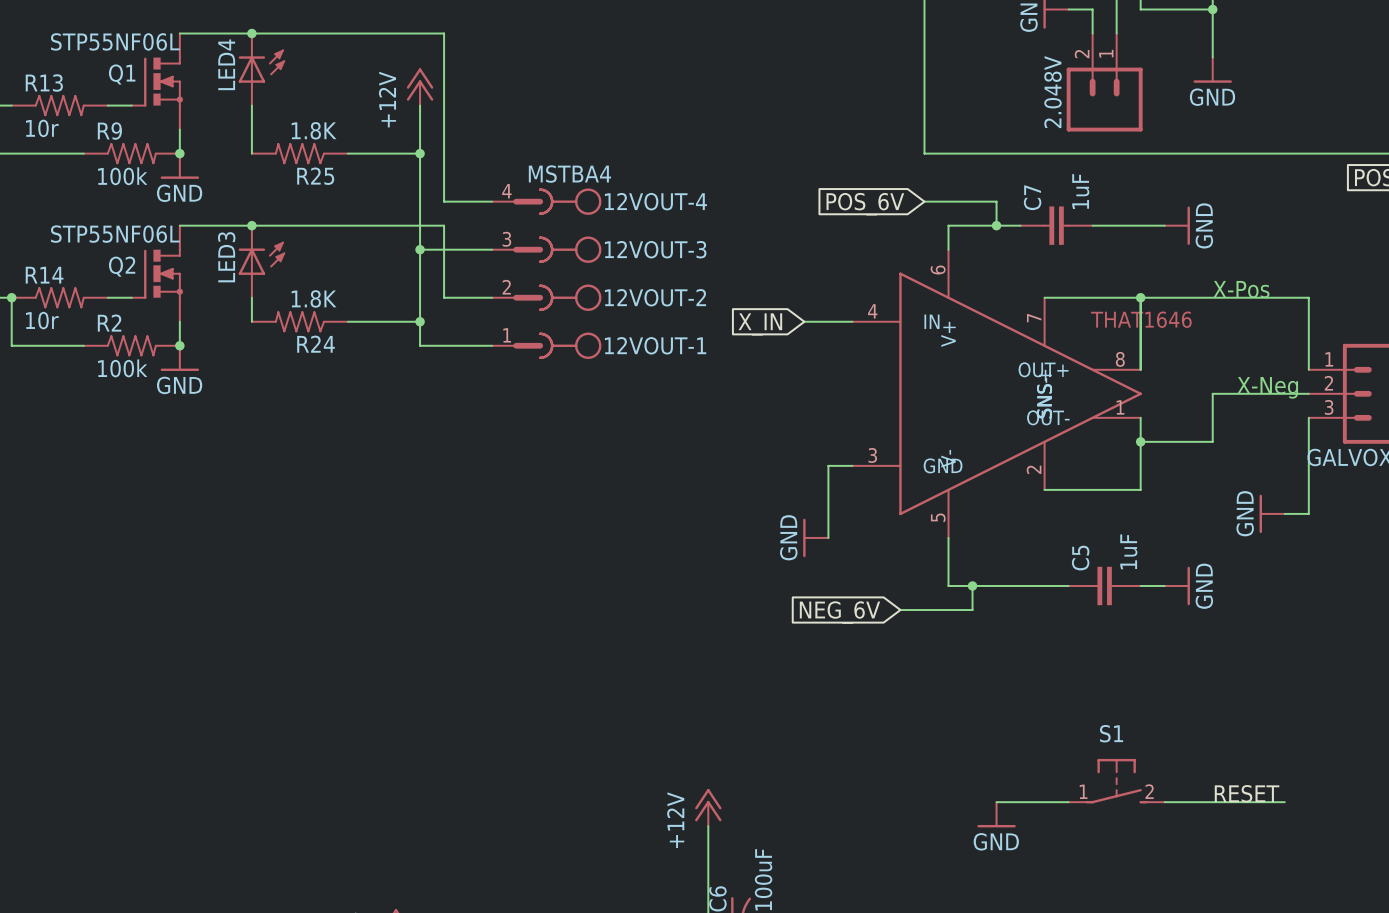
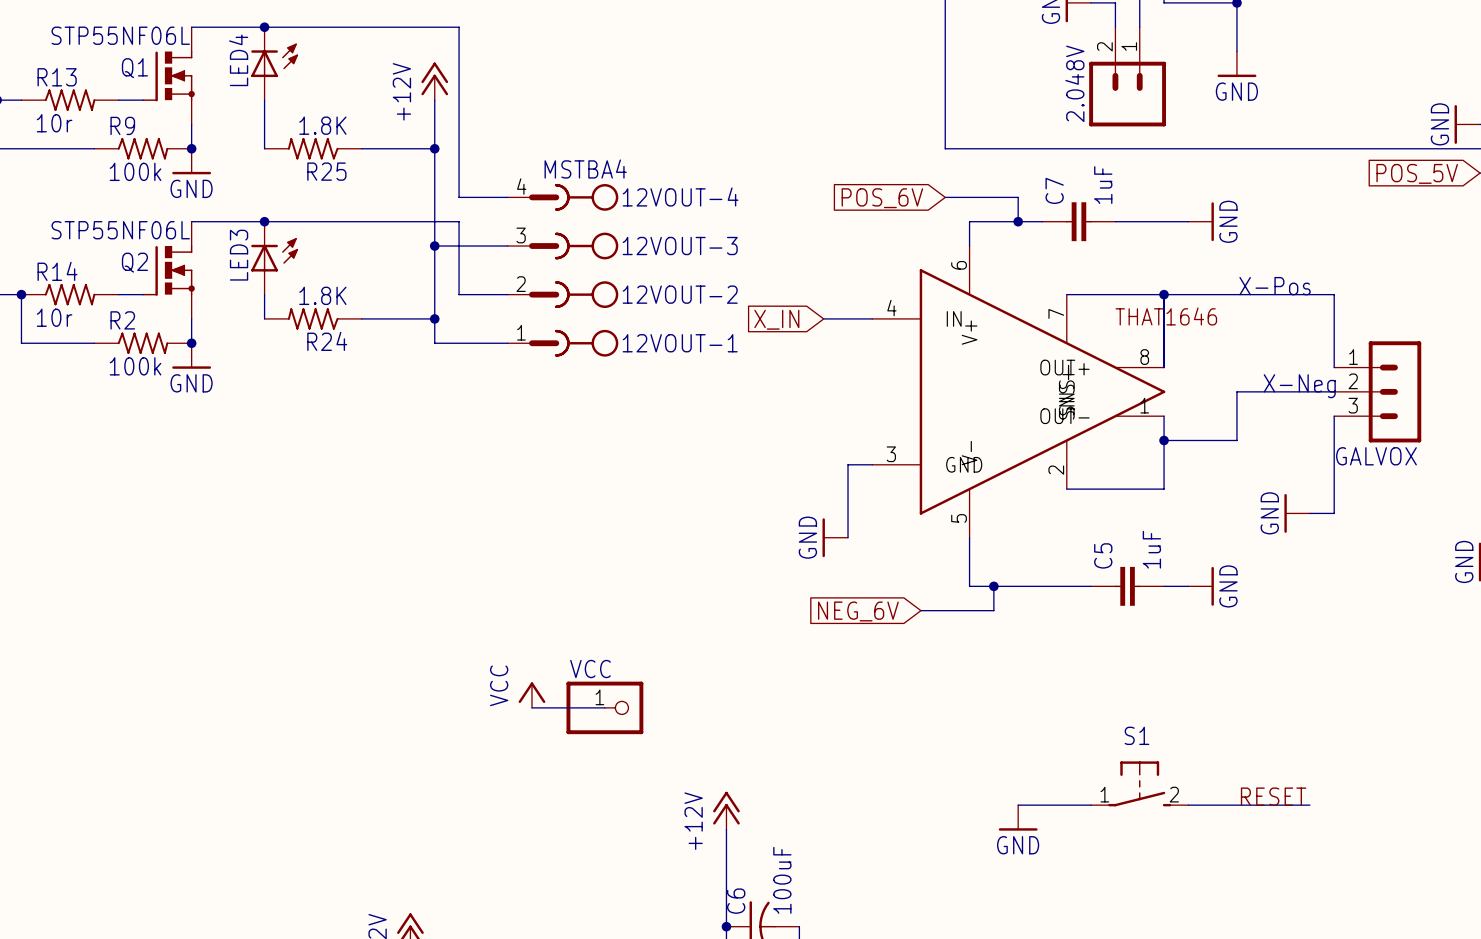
power symbol: none -> VCC (531, 695)
wire: none -> (531, 707) (604, 707)
VCC: none -> (604, 707)

